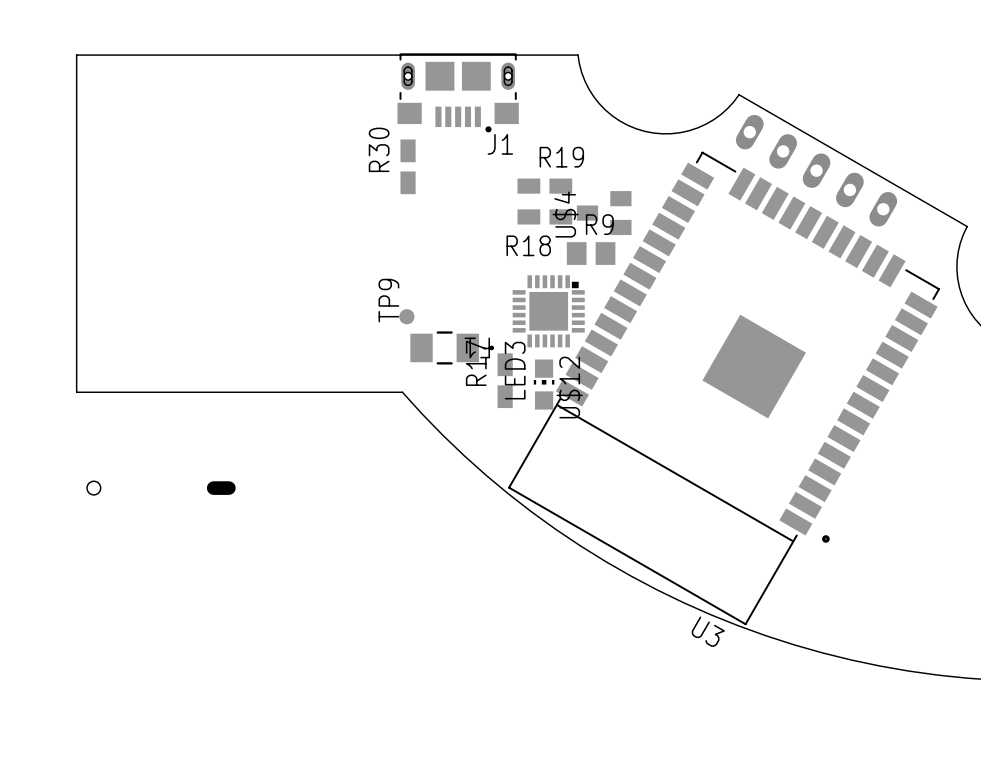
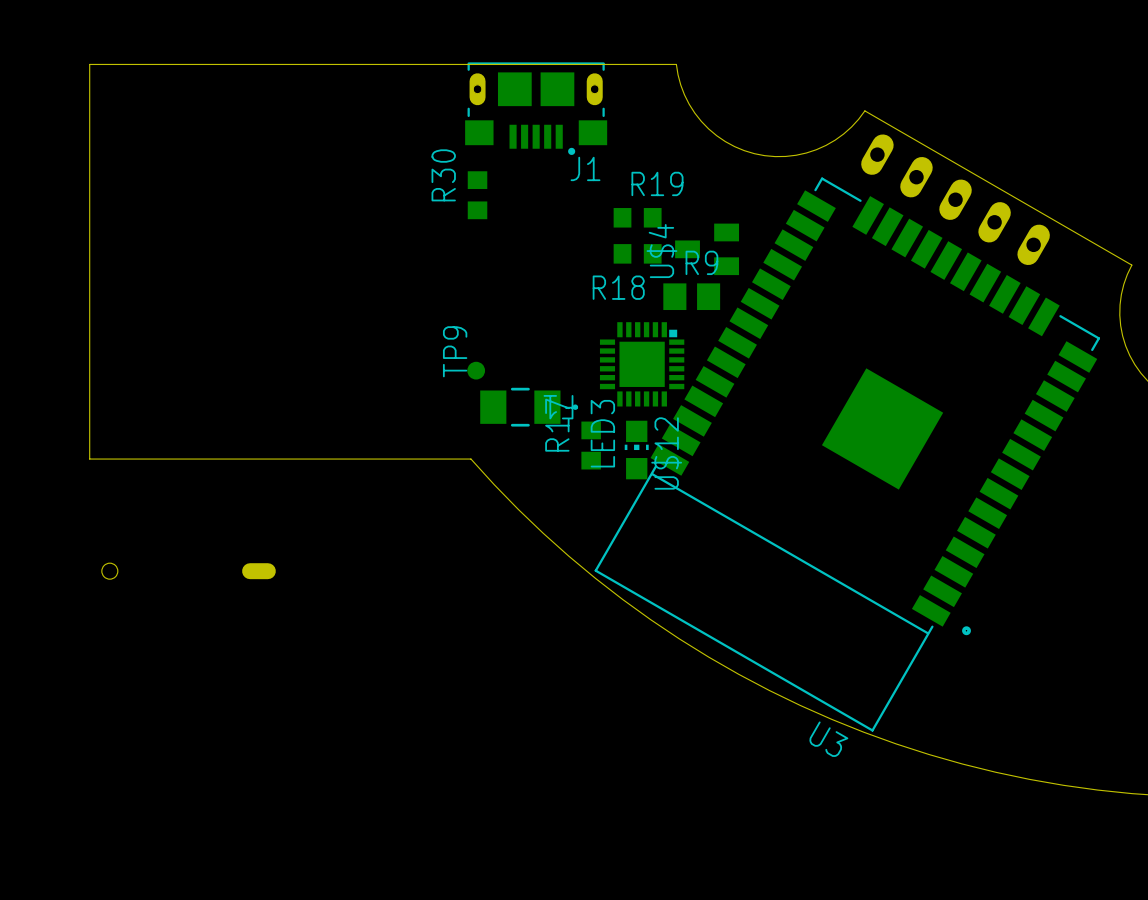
R30 footprint: [400, 139, 416, 195] -> [467, 171, 488, 220]
R19 footprint: [517, 178, 573, 194] -> [613, 208, 662, 228]
R18 footprint: [517, 209, 573, 225] -> [613, 244, 662, 264]
R17 footprint: [497, 353, 513, 409] -> [581, 421, 601, 470]

